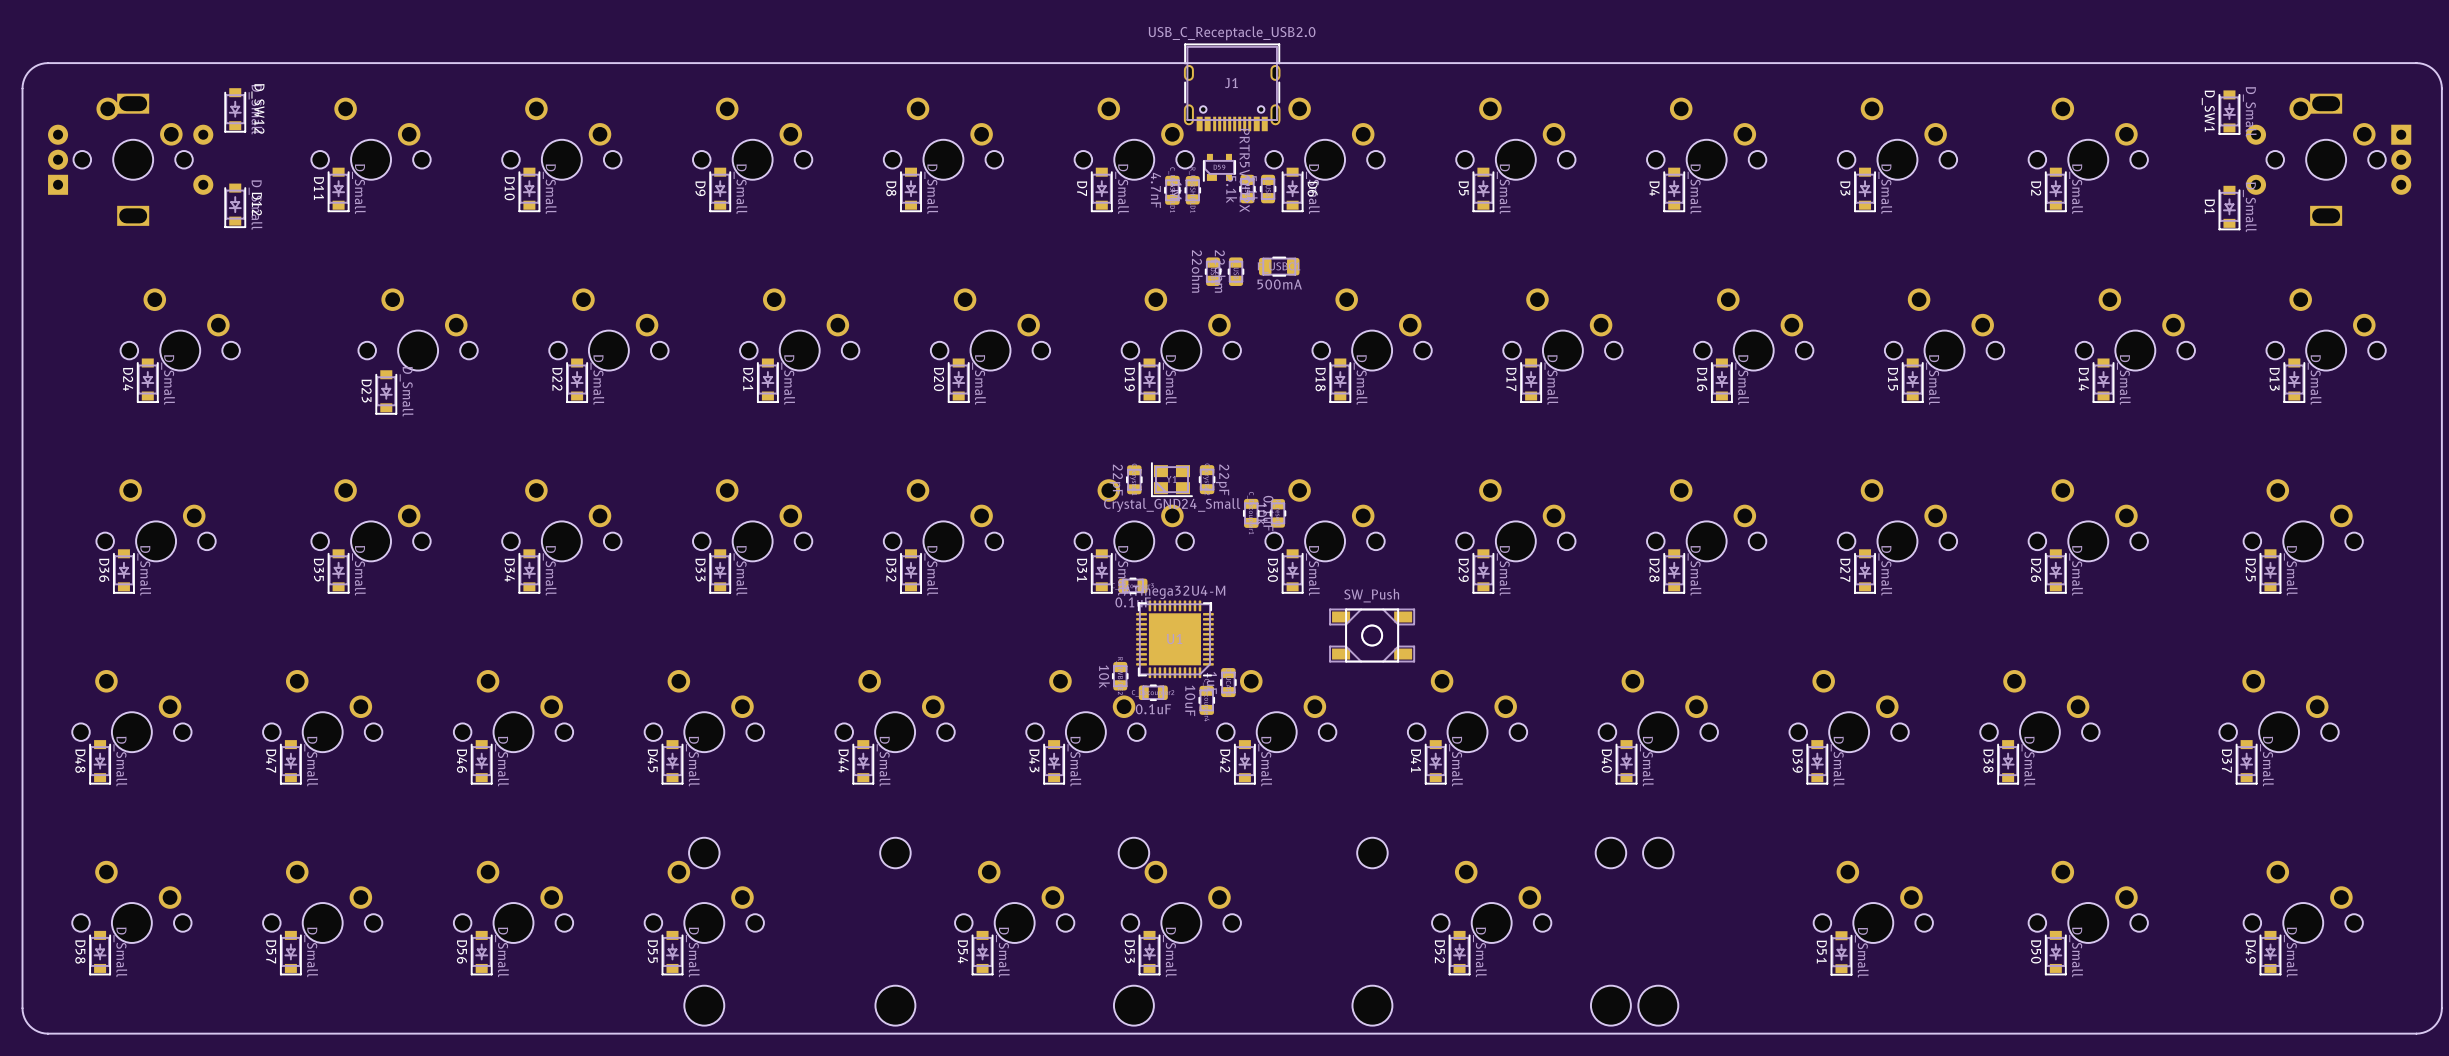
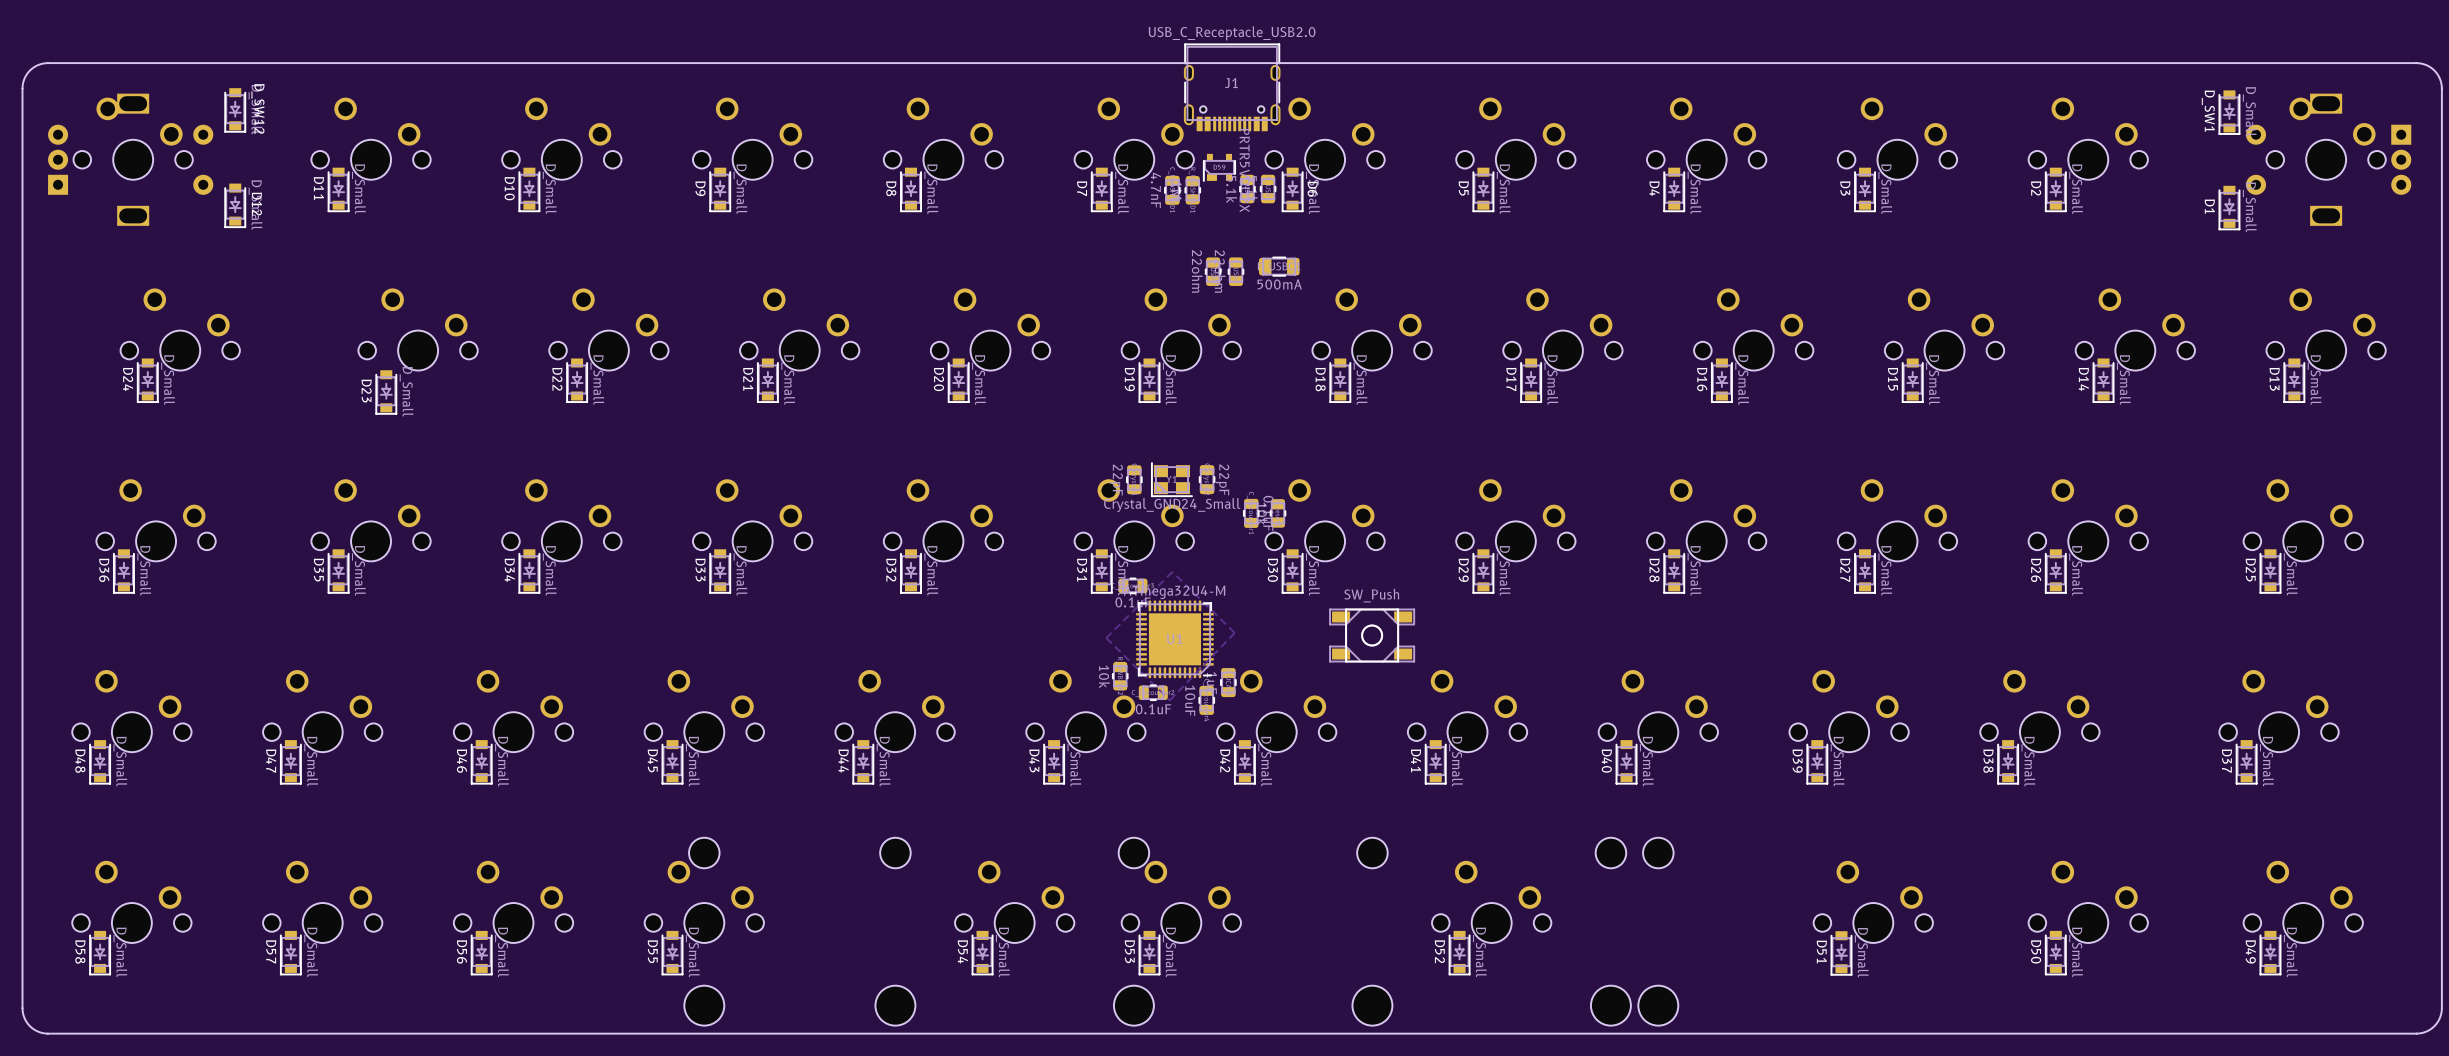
zone outline: none -> (1172, 571) (1234, 632) (1169, 700) (1106, 638) (1172, 571)

